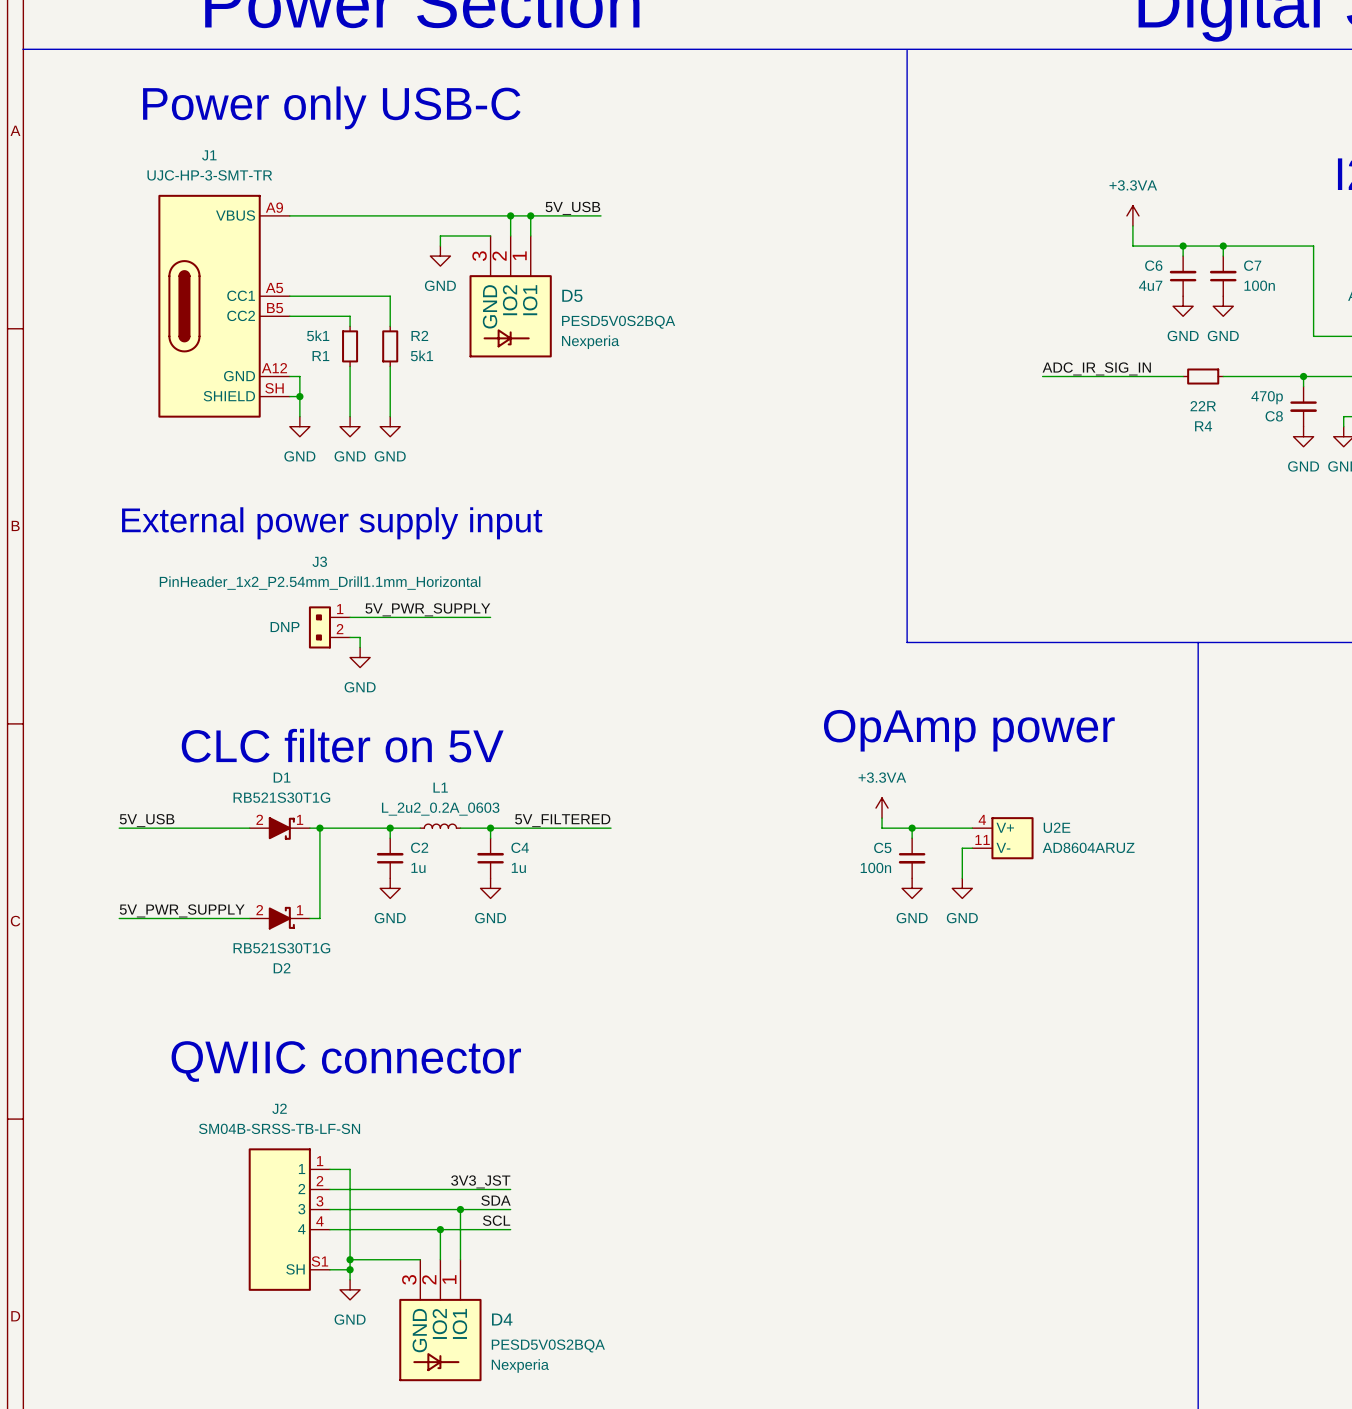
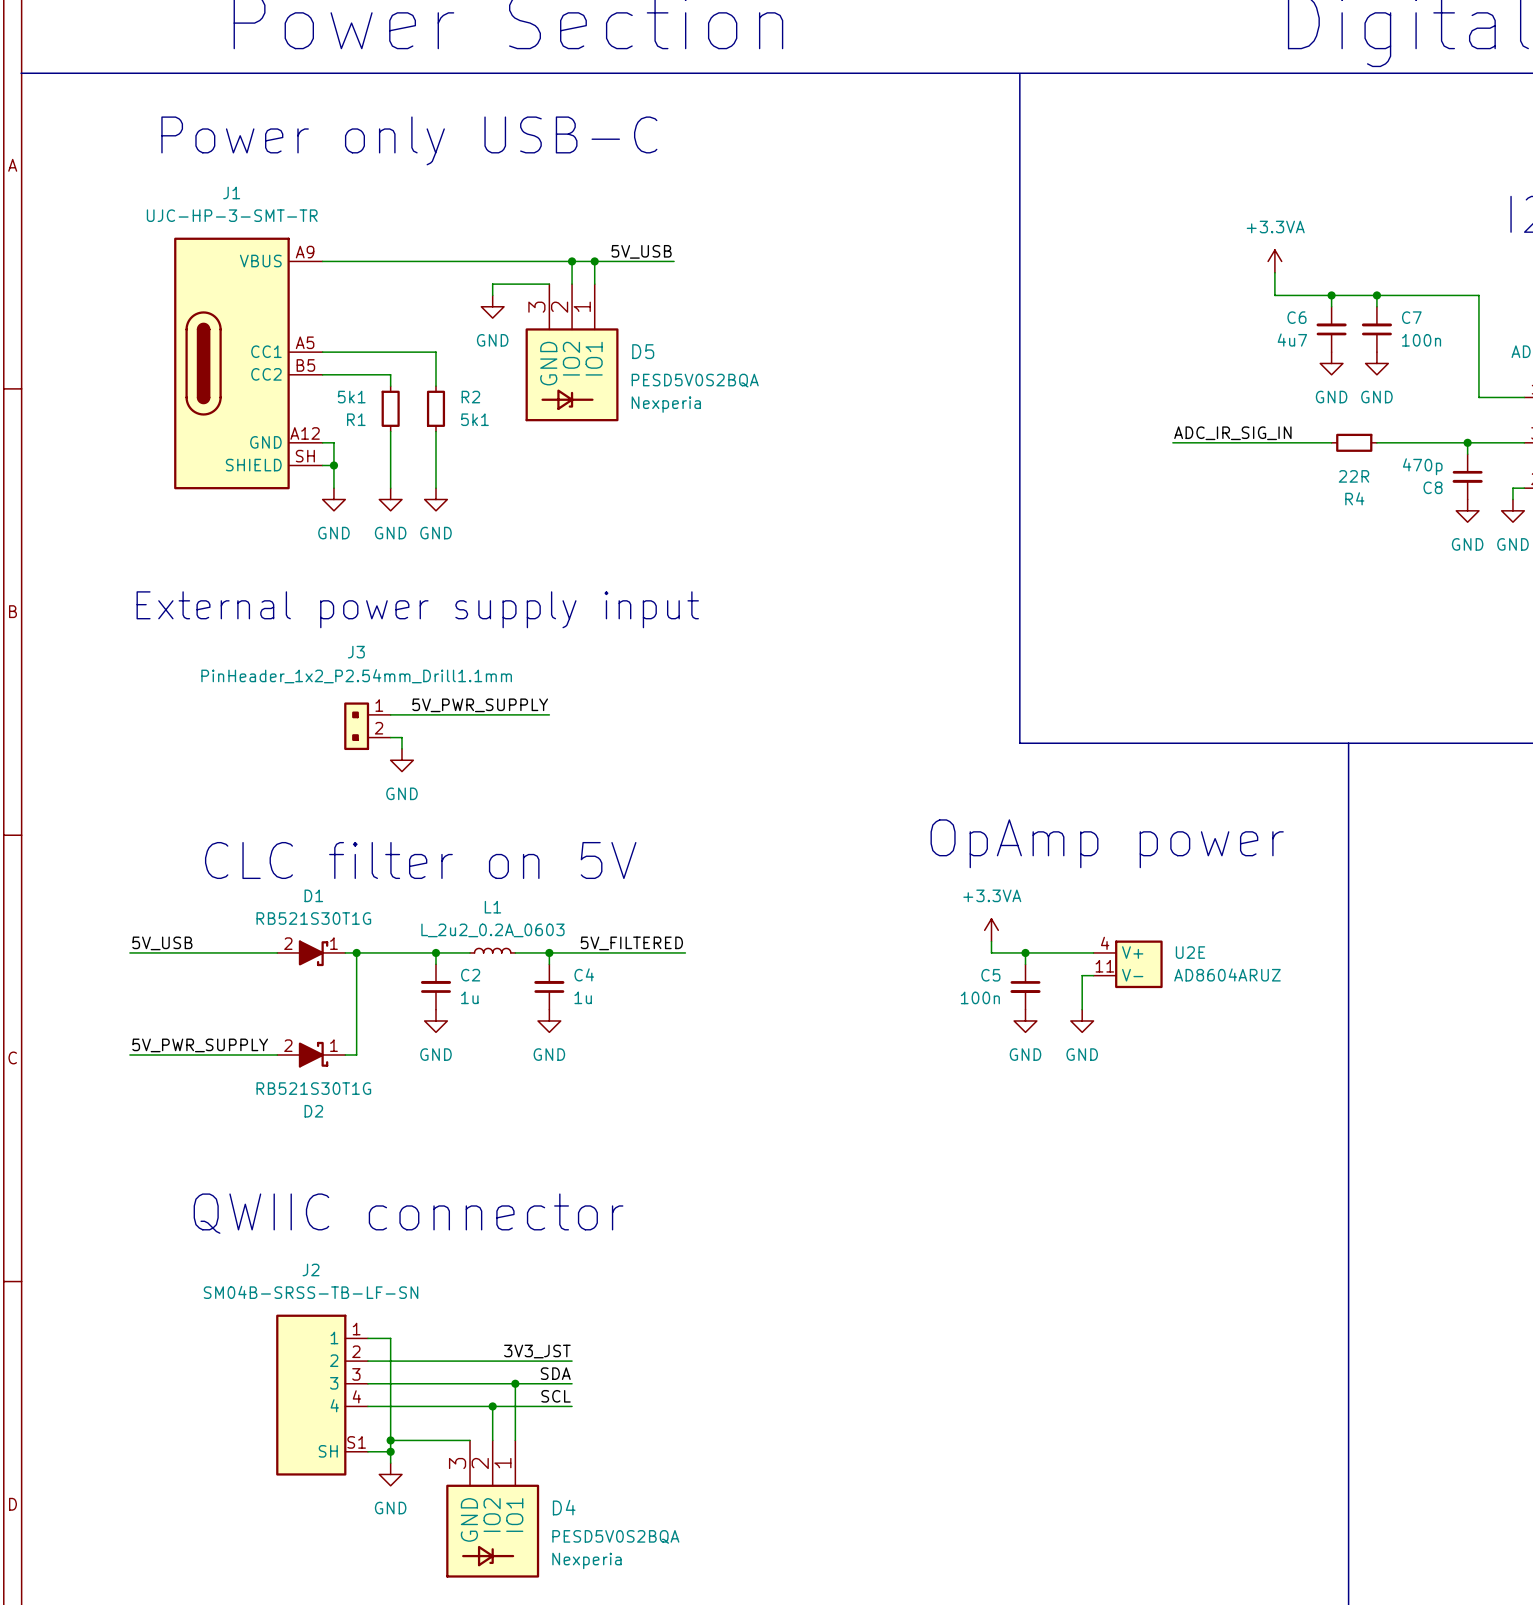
J3 value: PinHeader_1x2_P2.54mm_Drill1.1mm_Horizontal (320, 583) -> PinHeader_1x2_P2.54mm_Drill1.1mm (356, 676)
J3 text: DNP (285, 627) -> none

